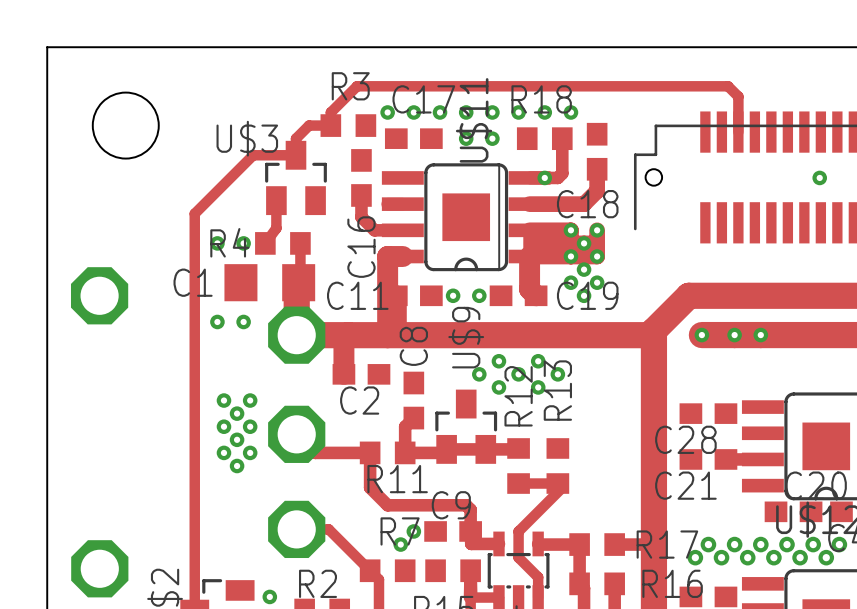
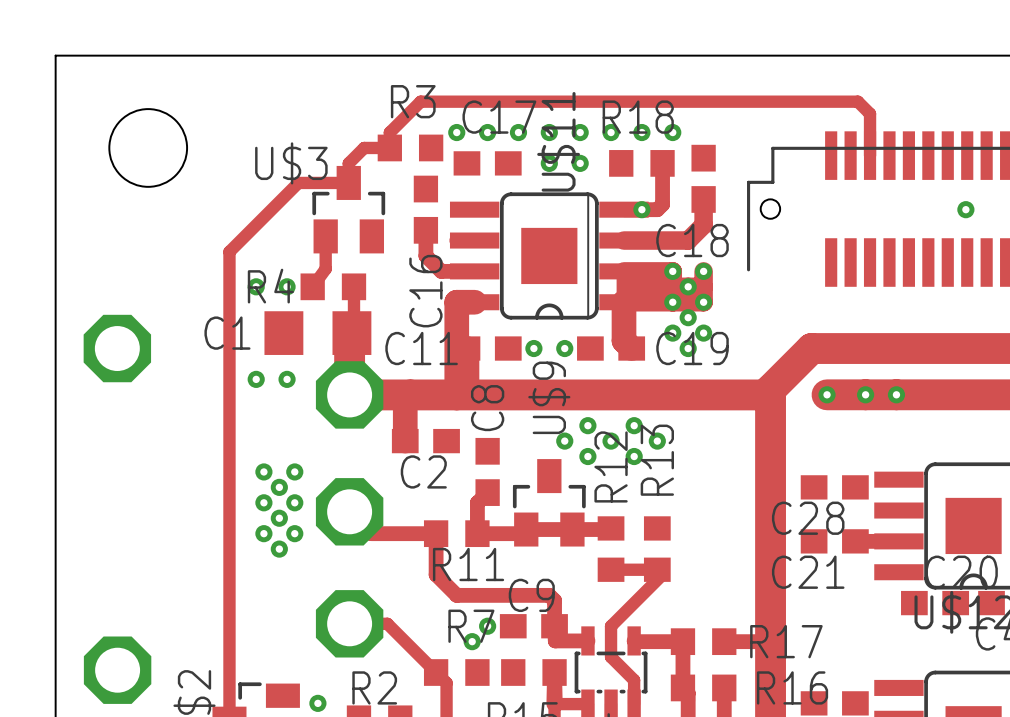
via: (708, 544) -> none
via: (734, 544) -> none
via: (760, 544) -> none
via: (786, 544) -> none
via: (813, 544) -> none
via: (839, 544) -> none
via: (695, 557) -> none
via: (721, 557) -> none
via: (747, 557) -> none
via: (773, 557) -> none
via: (800, 557) -> none
via: (826, 557) -> none

